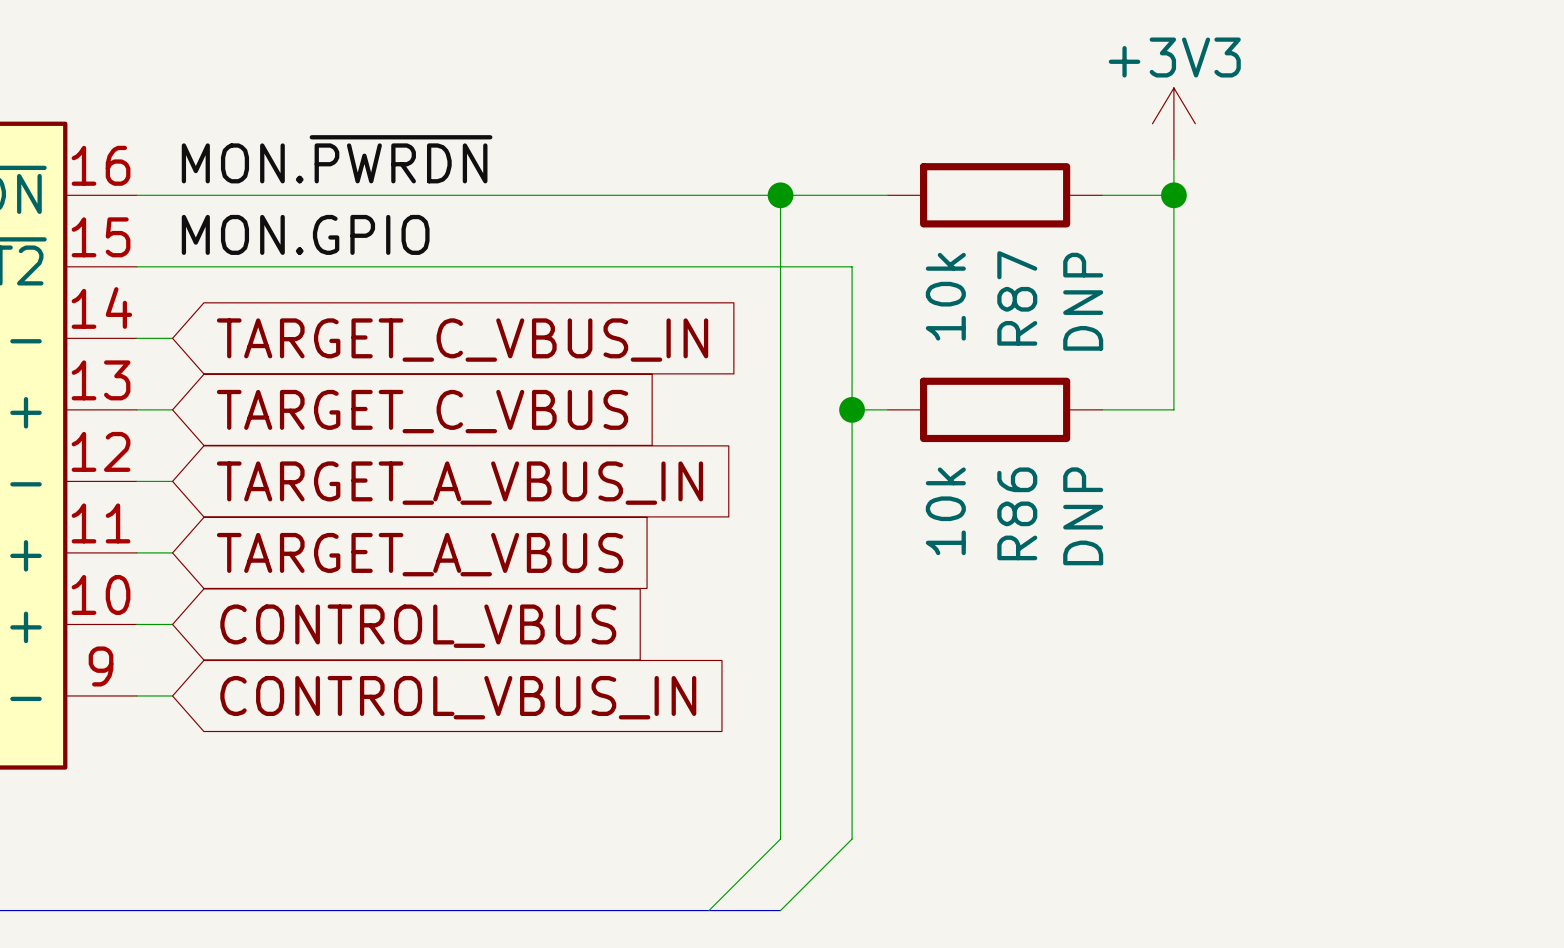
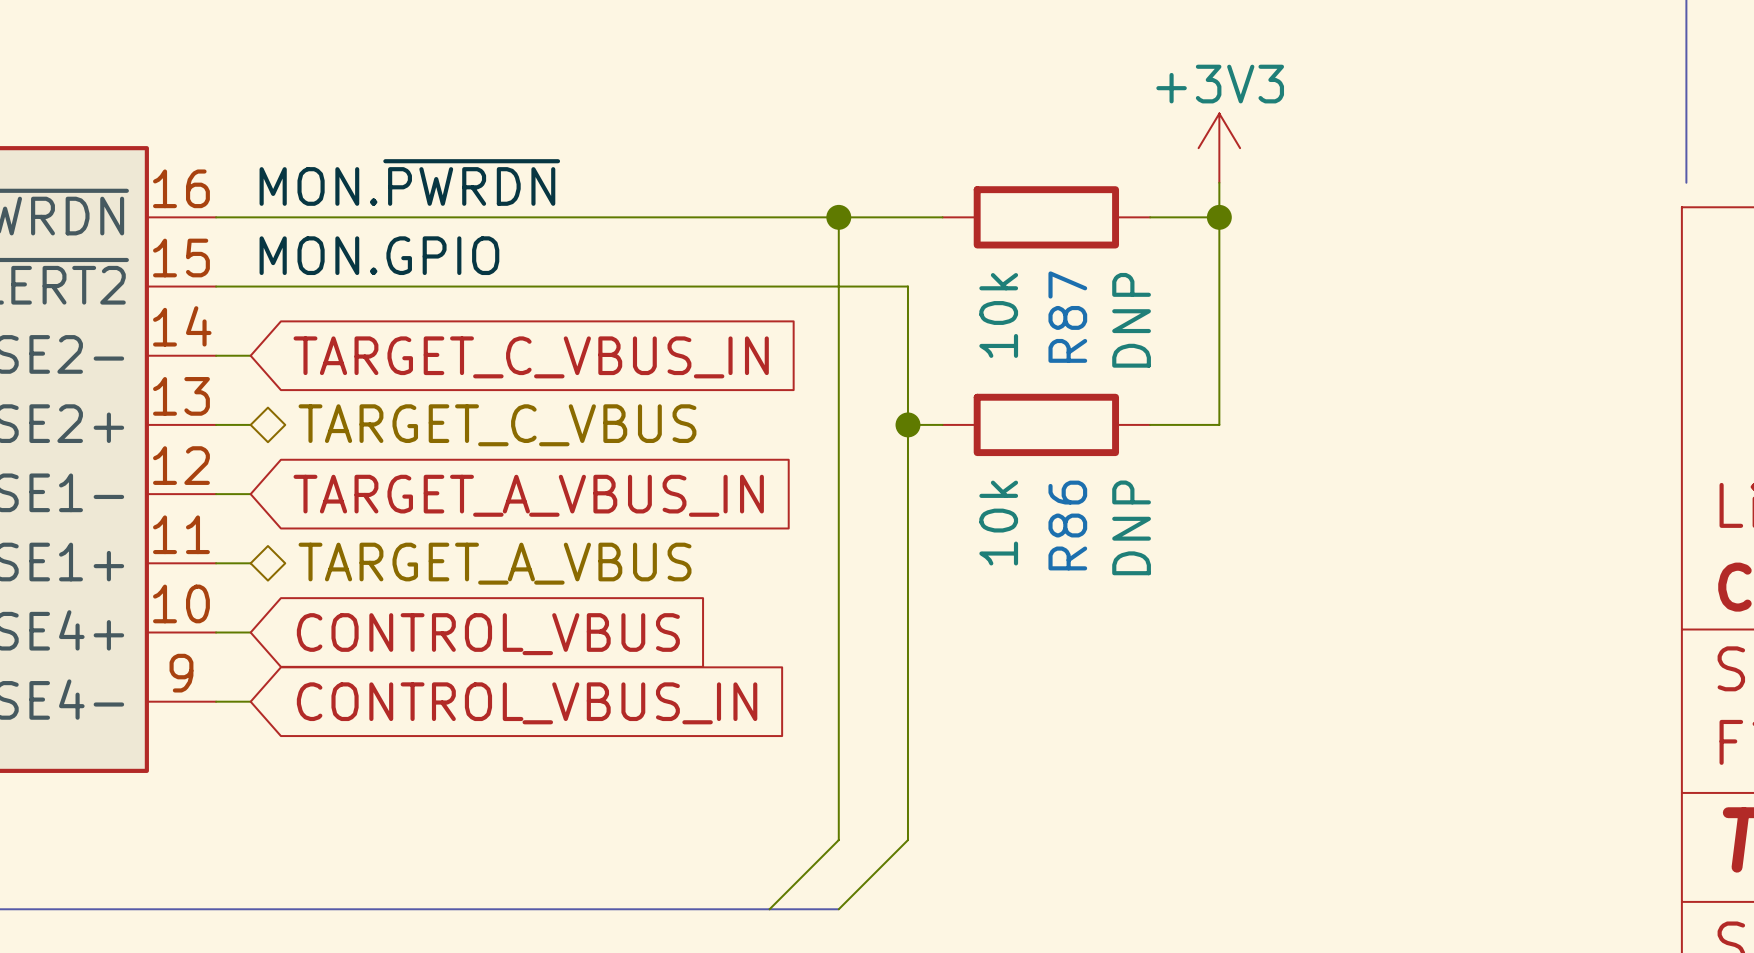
hierarchical label: none -> TARGET_C_VBUS (497, 425)
global label: TARGET_C_VBUS (422, 411) -> none
hierarchical label: none -> TARGET_A_VBUS (495, 563)
global label: TARGET_A_VBUS (419, 554) -> none

